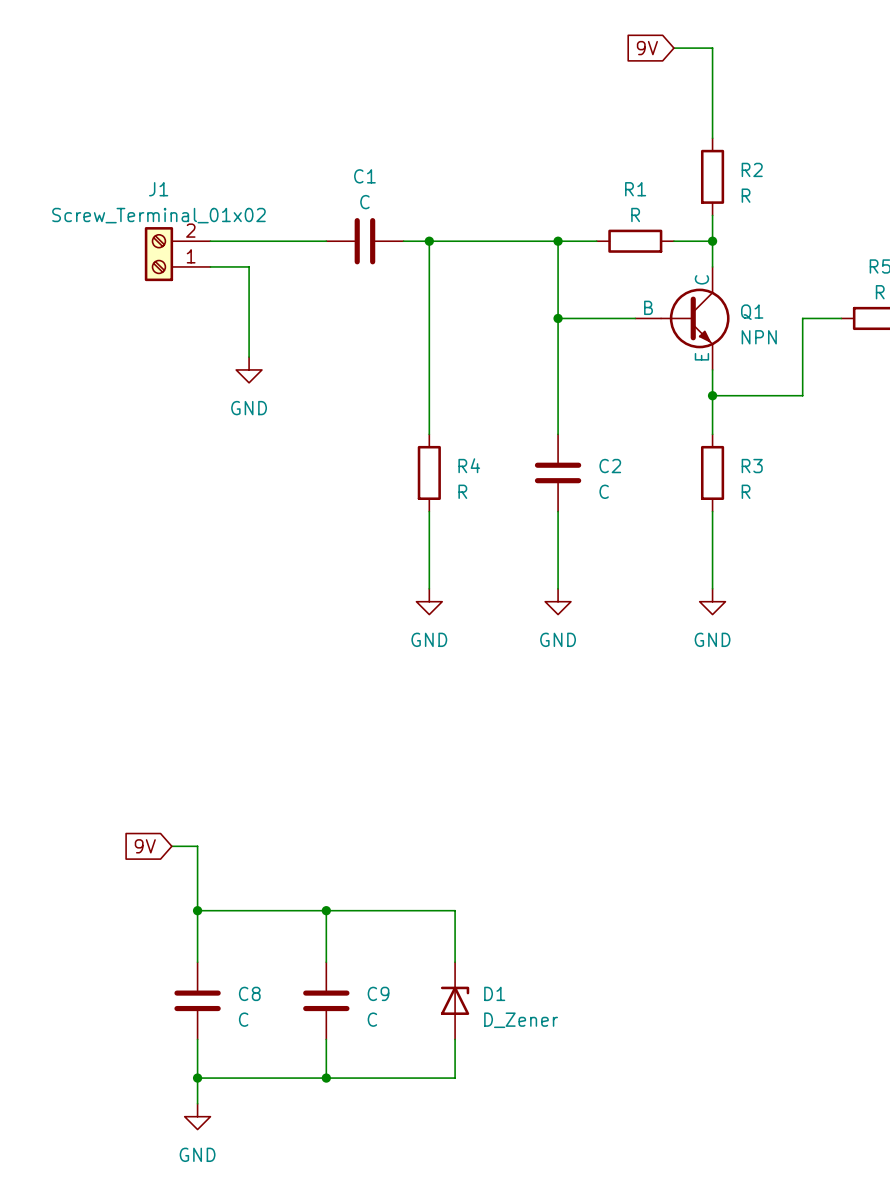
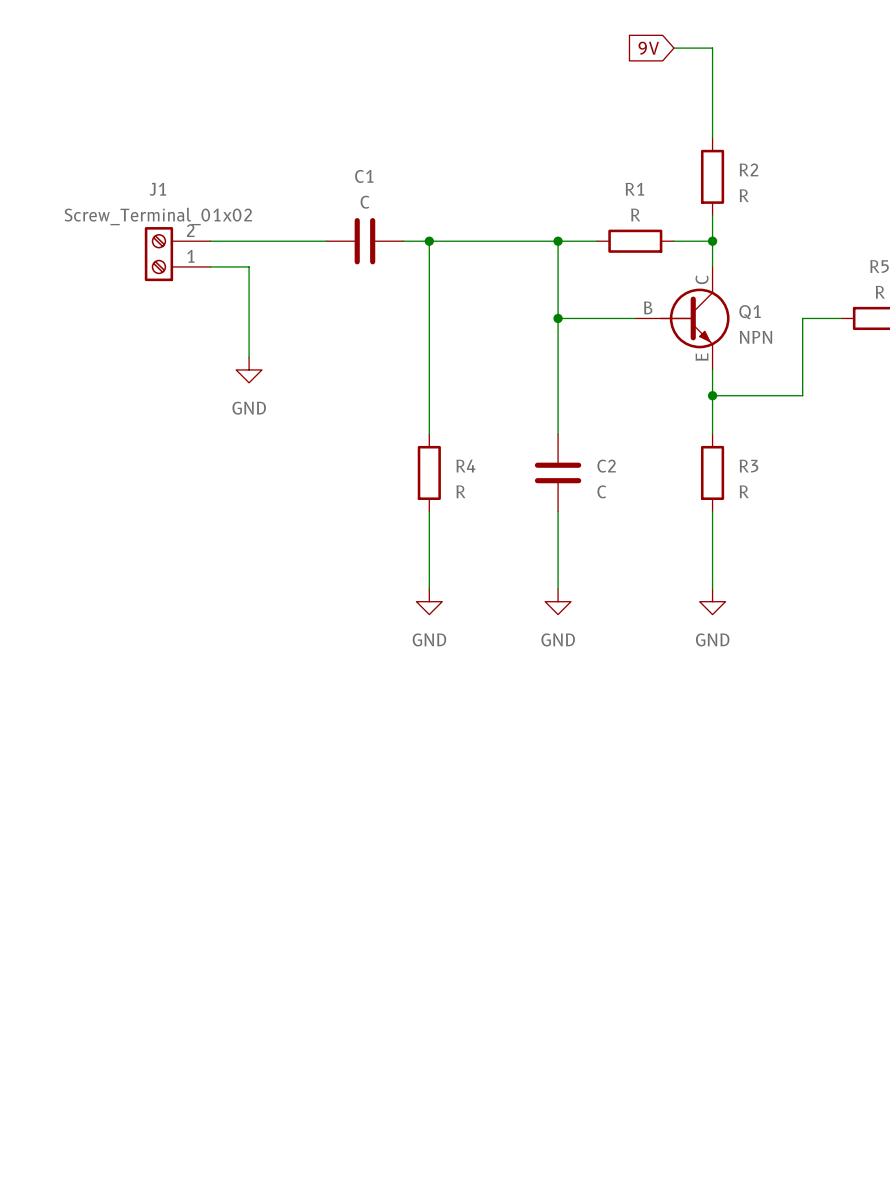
global label: 9V (145, 846) -> none
wire: (171, 846) (197, 846) (197, 962) -> none
wire: (197, 910) (455, 910) (455, 962) -> none
junction: (197, 910) -> none
wire: (326, 910) (326, 962) -> none
junction: (326, 910) -> none
C8: C (197, 1000) -> none
C9: C (326, 1000) -> none
D1: D_Zener (455, 1000) -> none
wire: (197, 1039) (197, 1103) -> none
wire: (326, 1039) (326, 1078) -> none
wire: (455, 1039) (455, 1078) (197, 1078) -> none
junction: (197, 1078) -> none
junction: (326, 1078) -> none
power symbol: GND (197, 1116) -> none

